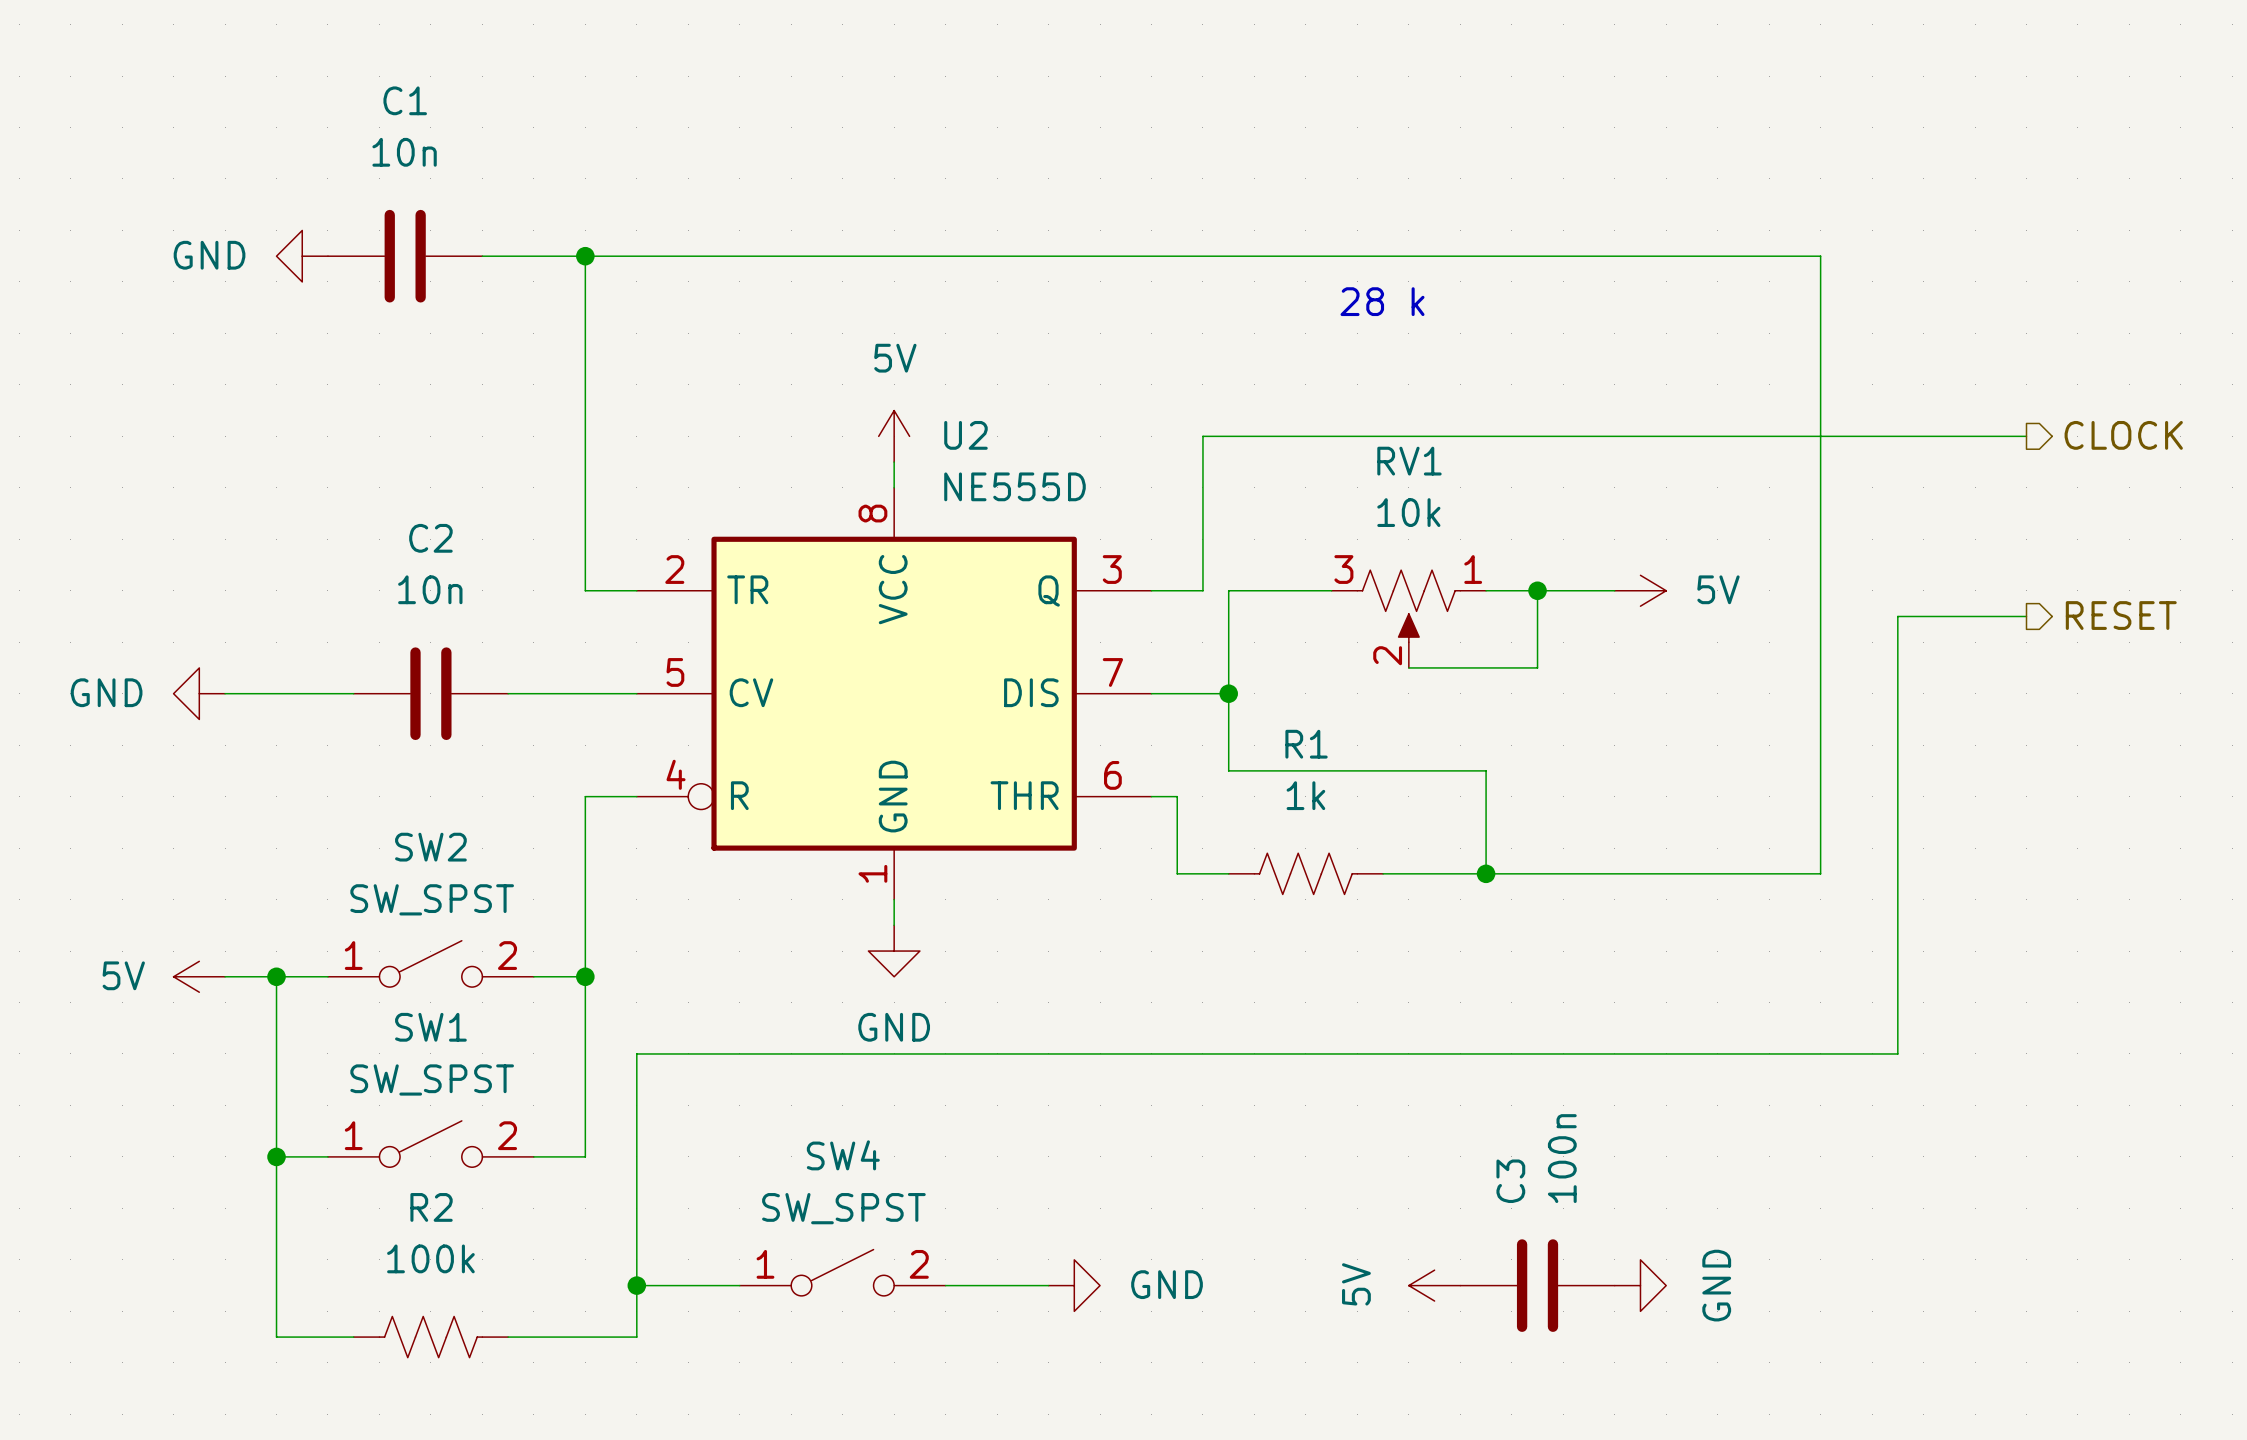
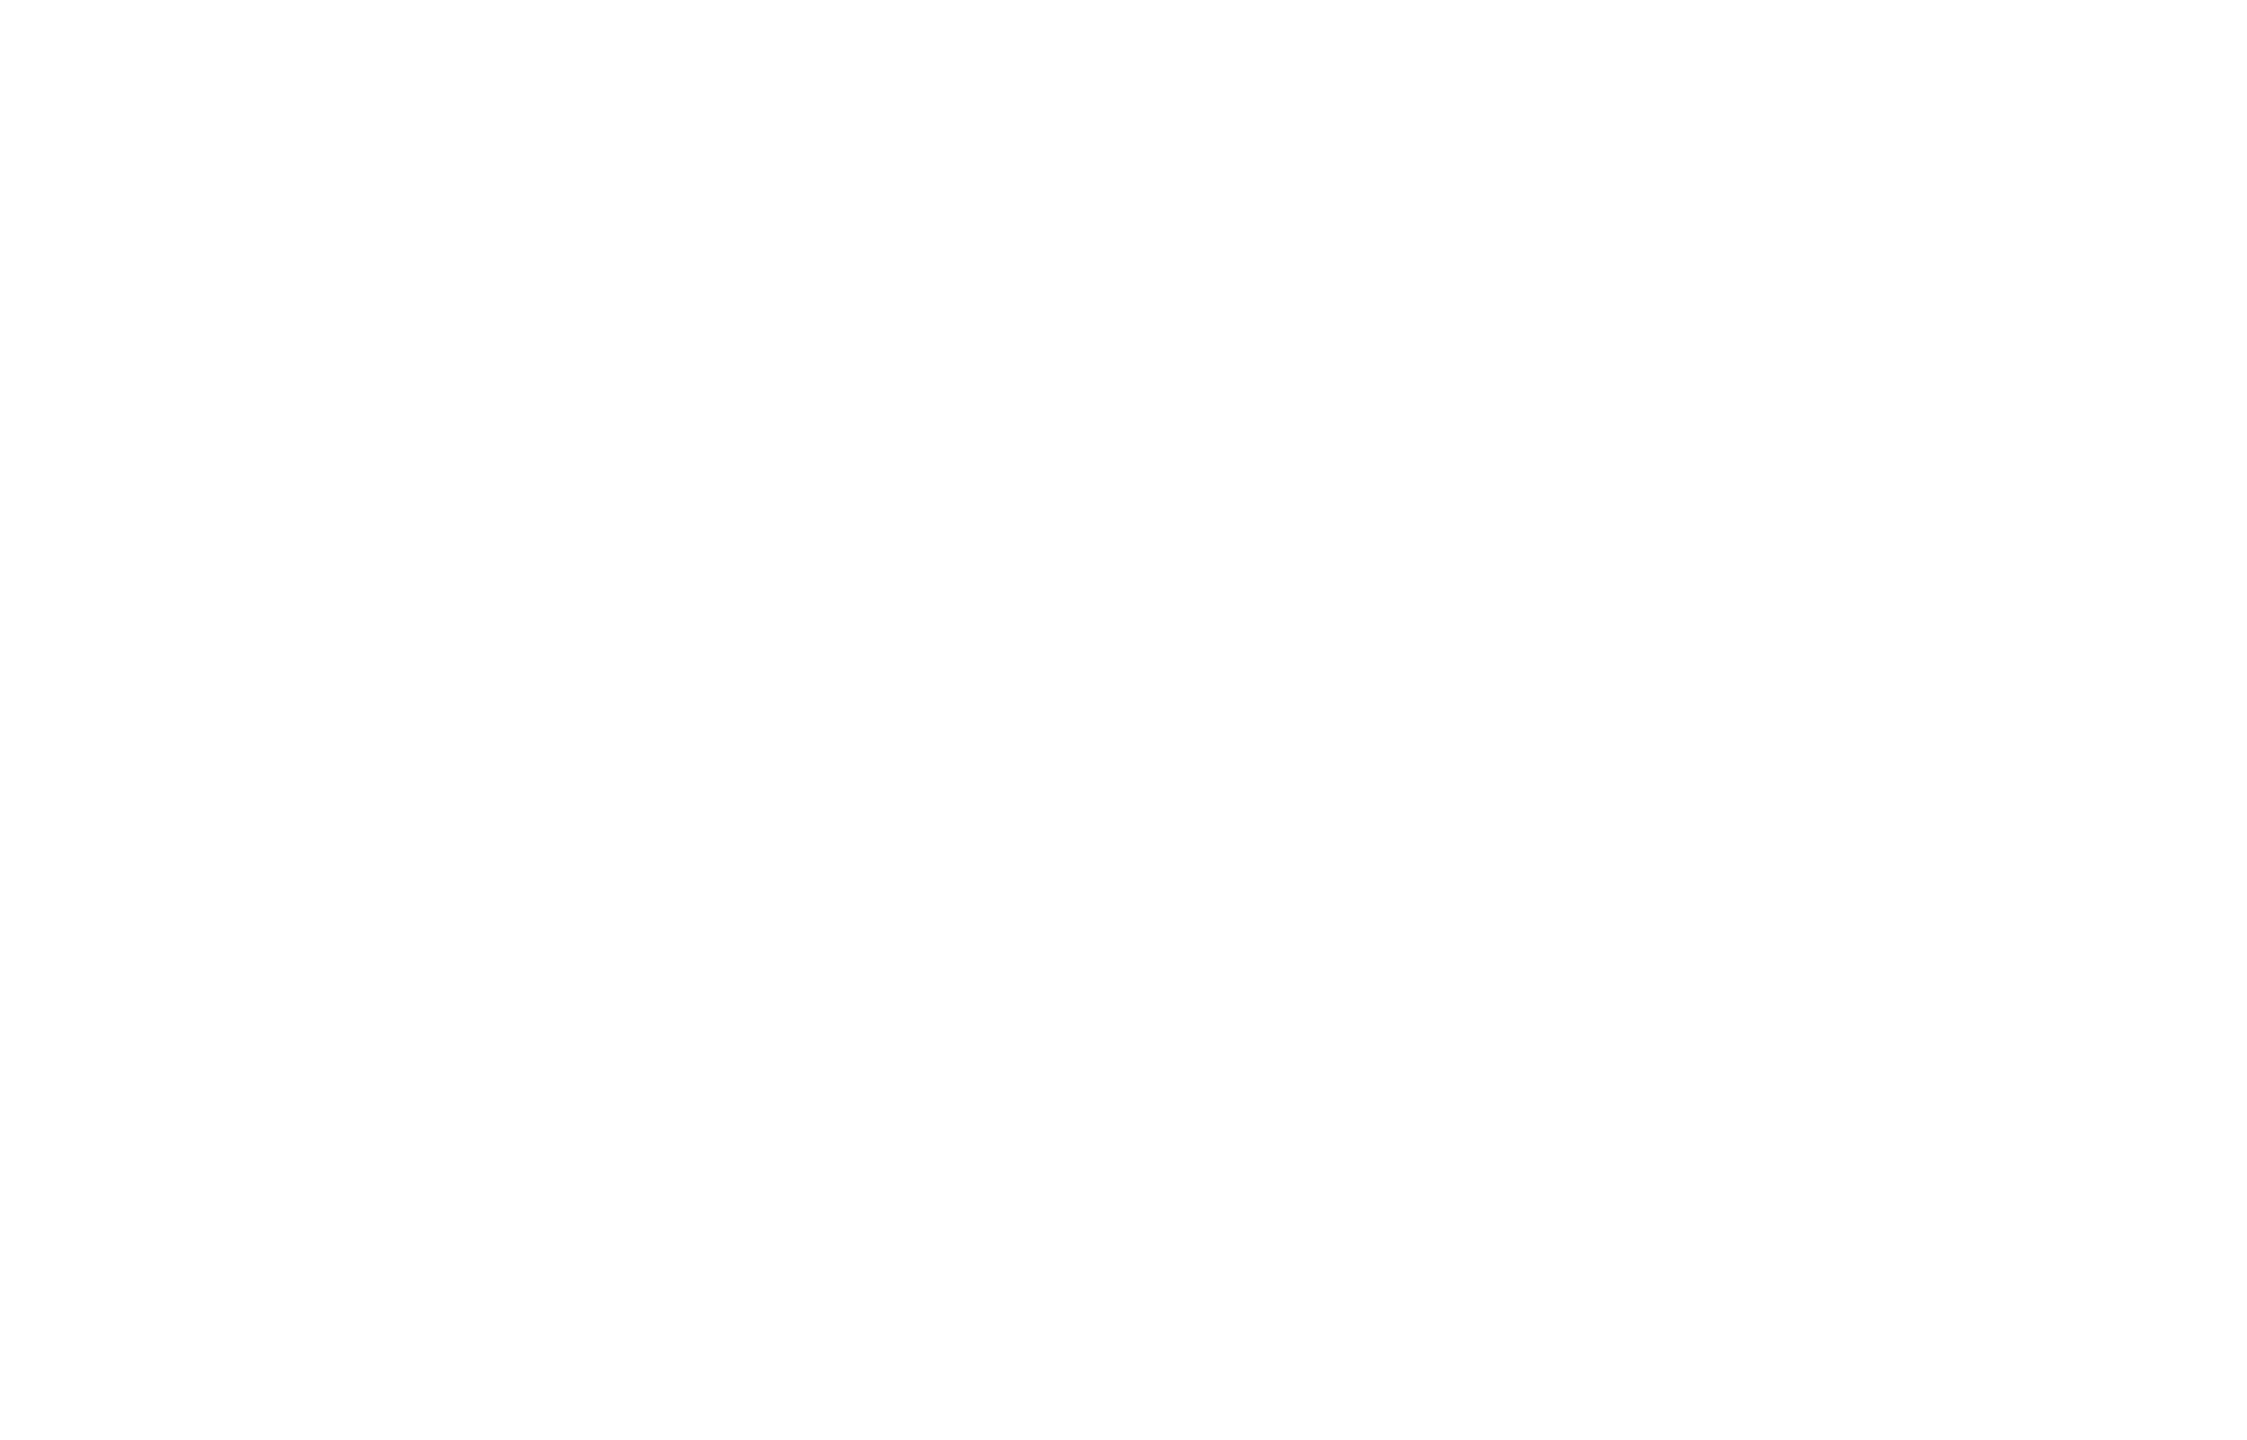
power symbol: GND (302, 256) -> none
C1: 10n (405, 256) -> none
wire: (482, 256) (1820, 256) (1820, 873) (1383, 873) -> none
wire: (585, 256) (585, 590) (636, 590) -> none
junction: (585, 256) -> none
text: 28 k (1382, 301) -> none
hierarchical label: CLOCK (2123, 435) -> none
power symbol: 5V (894, 436) -> none
wire: (2026, 436) (1202, 436) (1202, 590) (1151, 590) -> none
wire: (894, 462) (894, 487) -> none
wire: (1331, 590) (1228, 590) (1228, 770) (1486, 770) (1486, 873) -> none
wire: (1486, 590) (1614, 590) -> none
wire: (1537, 590) (1537, 667) (1408, 667) -> none
junction: (1537, 590) -> none
power symbol: 5V (1640, 590) -> none
hierarchical label: RESET (2121, 615) -> none
wire: (2026, 616) (1897, 616) (1897, 1053) (636, 1053) (636, 1337) (508, 1337) -> none
RV1: 10k (1408, 619) -> none
power symbol: GND (199, 693) -> none
wire: (225, 693) (353, 693) -> none
C2: 10n (430, 693) -> none
wire: (508, 693) (636, 693) -> none
U2: NE555D (894, 693) -> none
wire: (1151, 693) (1228, 693) -> none
junction: (1228, 693) -> none
wire: (636, 796) (585, 796) (585, 1156) (533, 1156) -> none
wire: (1151, 796) (1177, 796) (1177, 873) (1228, 873) -> none
R1: 1k (1305, 873) -> none
junction: (1486, 873) -> none
wire: (894, 899) (894, 925) -> none
power symbol: GND (894, 951) -> none
SW2: SW_SPST (430, 963) -> none
power symbol: 5V (199, 976) -> none
wire: (225, 976) (327, 976) -> none
wire: (276, 976) (276, 1337) (353, 1337) -> none
junction: (276, 976) -> none
wire: (533, 976) (585, 976) -> none
junction: (585, 976) -> none
SW1: SW_SPST (430, 1144) -> none
wire: (276, 1156) (327, 1156) -> none
junction: (276, 1156) -> none
SW4: SW_SPST (842, 1272) -> none
wire: (636, 1285) (739, 1285) -> none
junction: (636, 1285) -> none
wire: (945, 1285) (1048, 1285) -> none
power symbol: GND (1074, 1285) -> none
power symbol: 5V (1434, 1285) -> none
C3: 100n (1537, 1285) -> none
power symbol: GND (1640, 1285) -> none
R2: 100k (430, 1337) -> none

